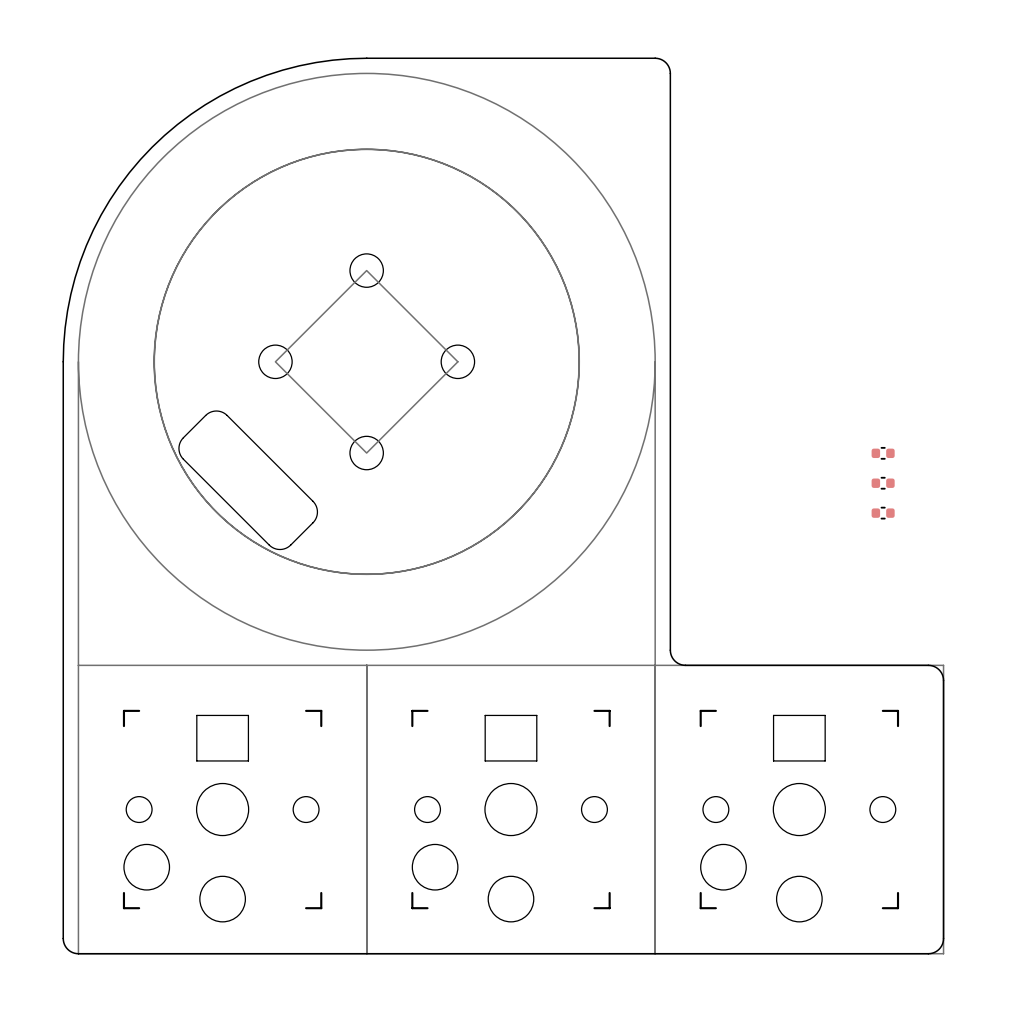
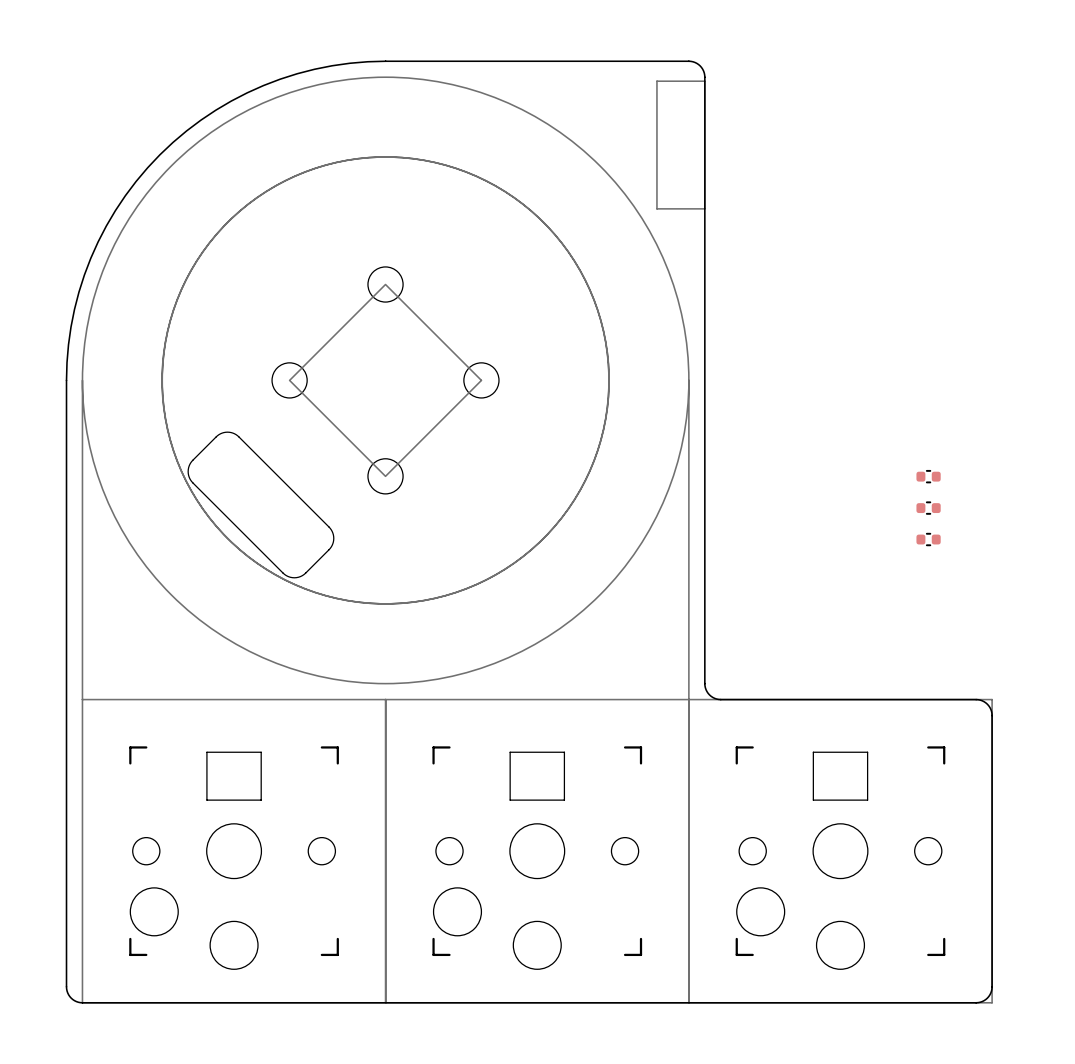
line: none -> (656, 81) (704, 81) (704, 208) (656, 208) (656, 81)

